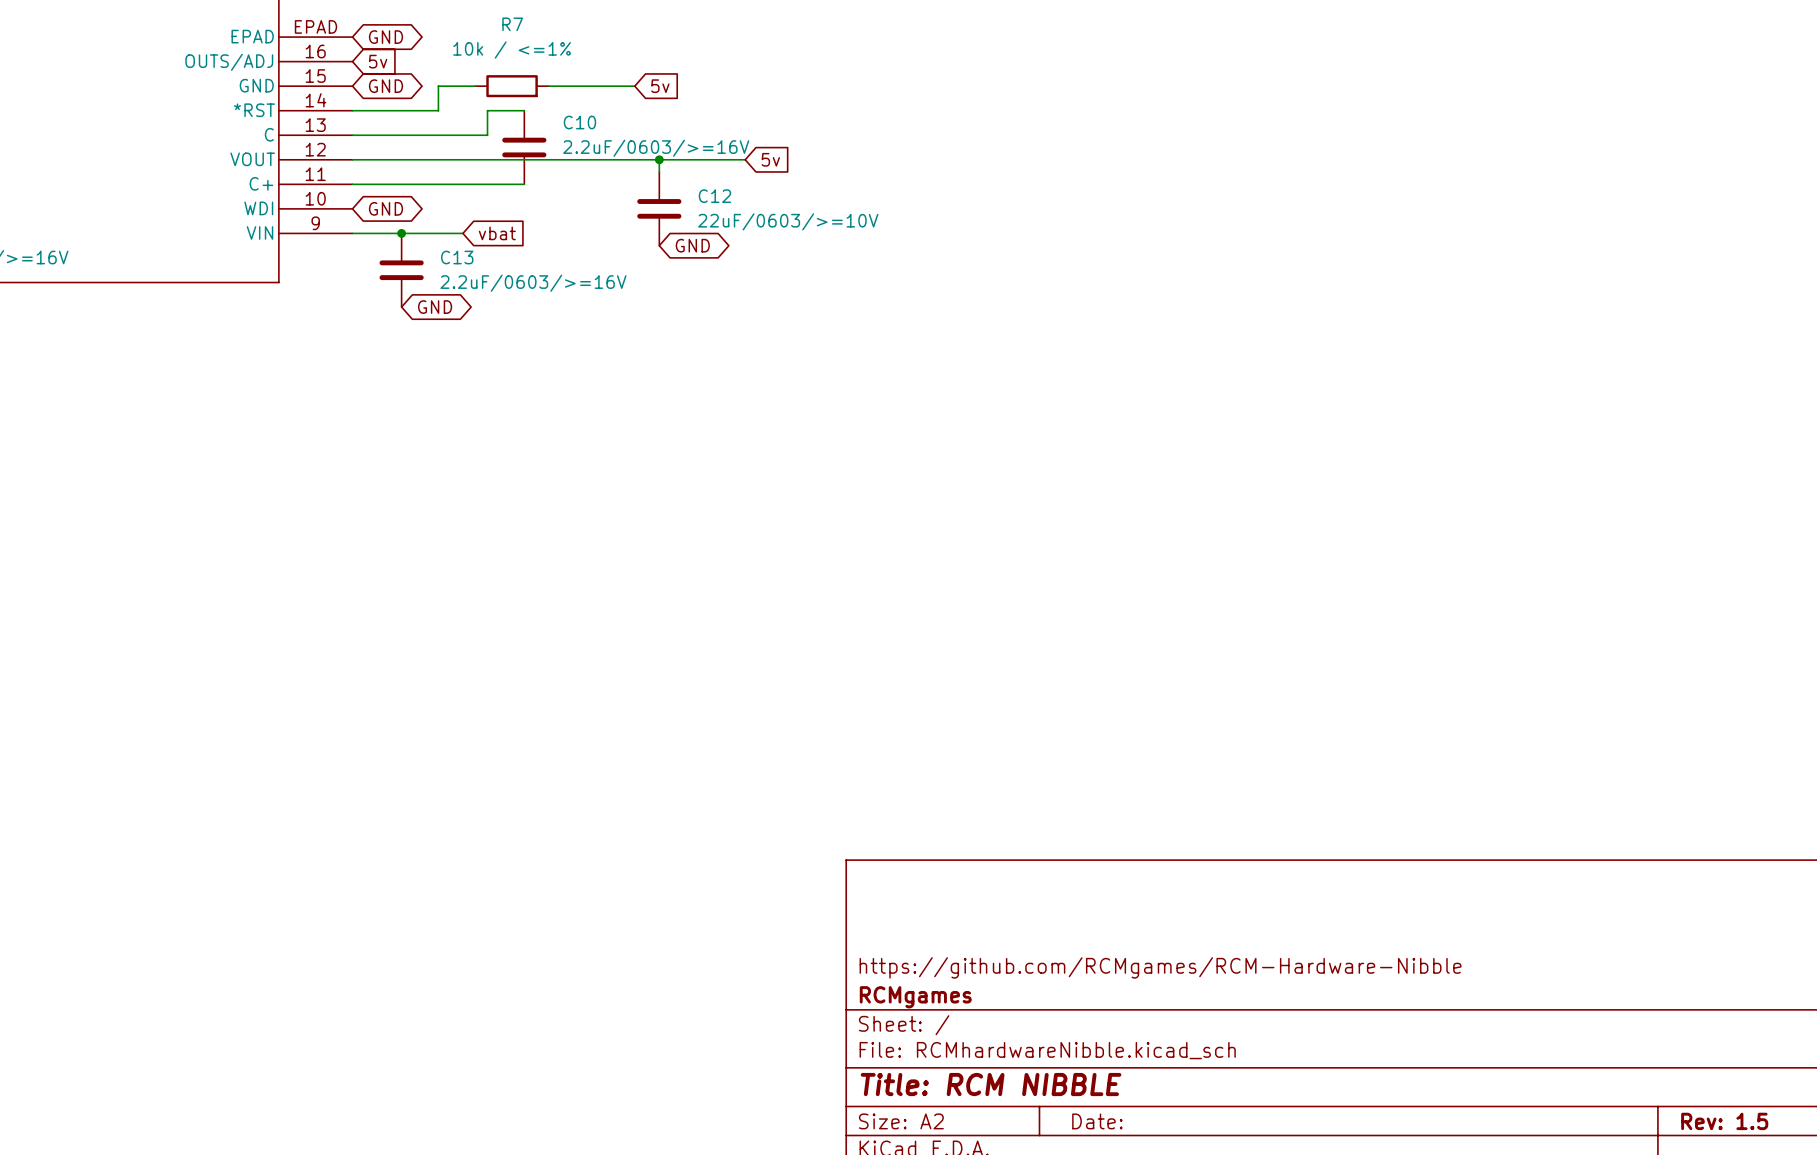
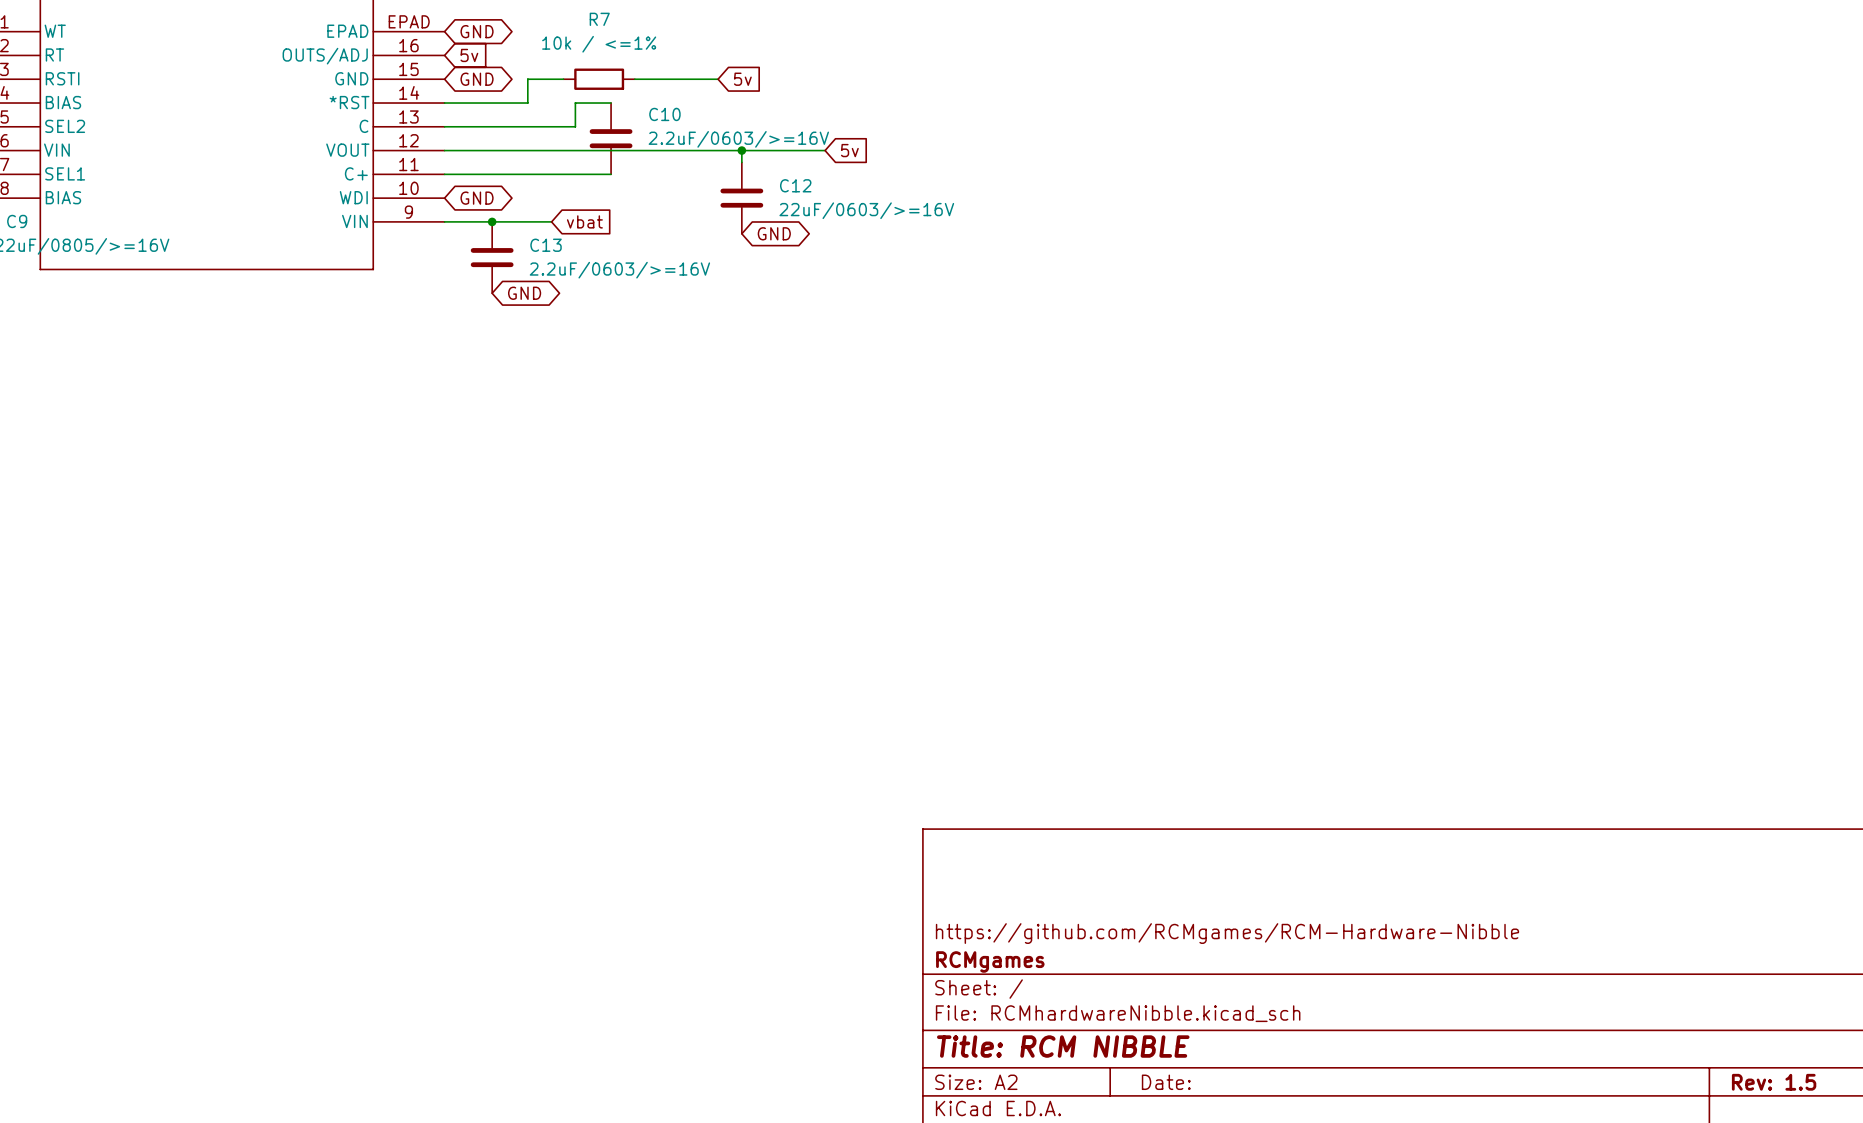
C12 value: 22uF/0603/>=10V (788, 221) -> 22uF/0603/>=16V (866, 210)

